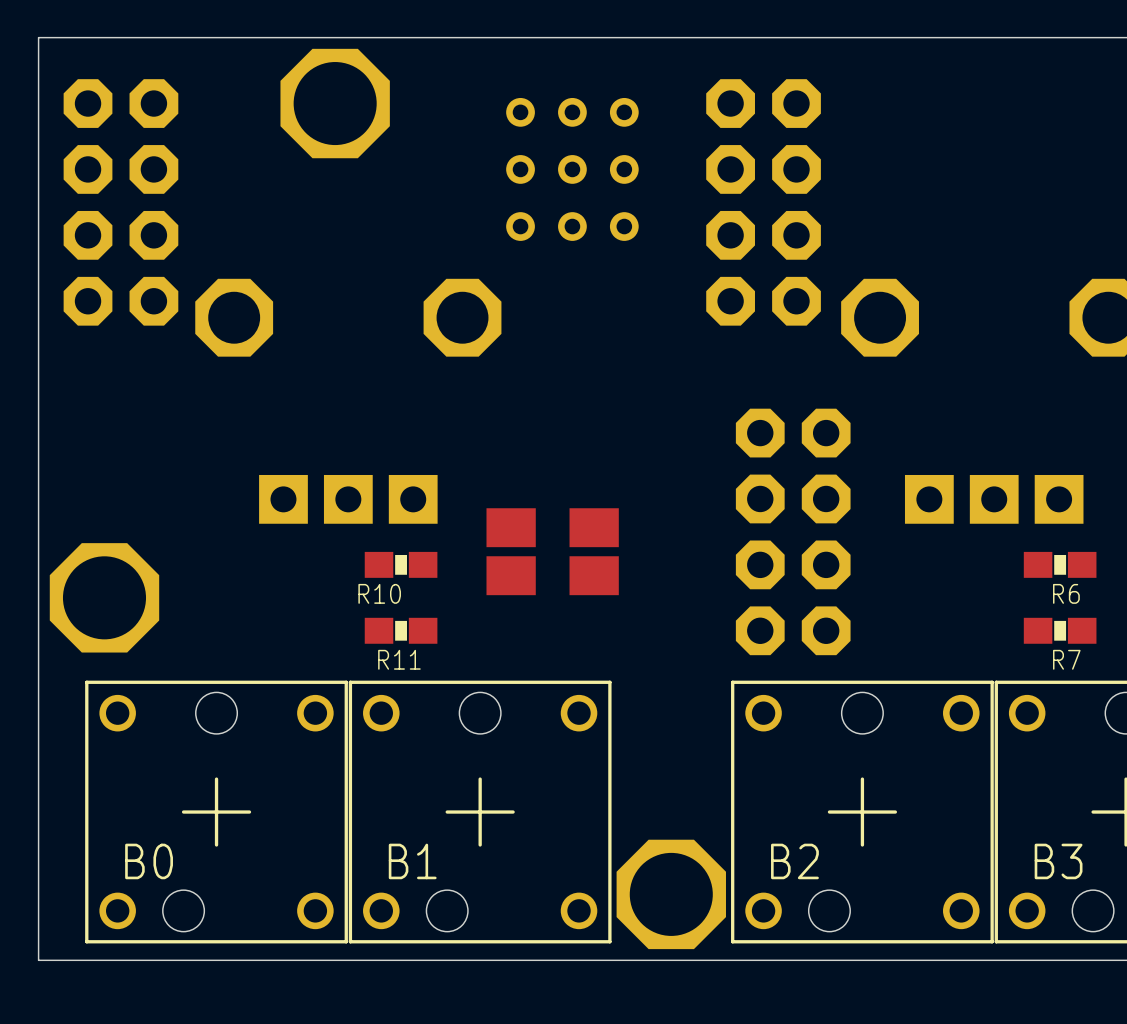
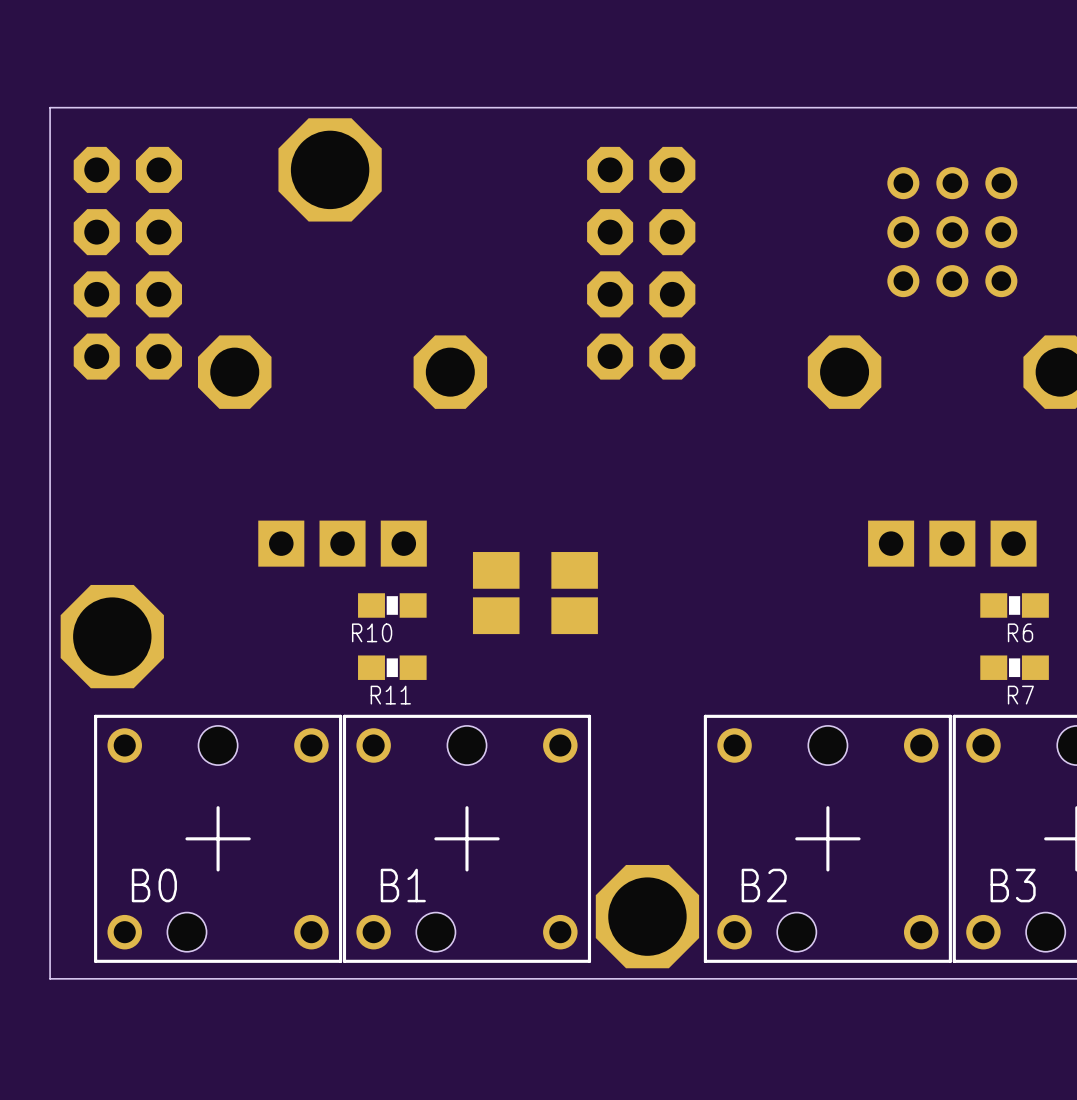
part: (572, 169) -> none
part: none -> (952, 232)
part position: (763, 202) -> (641, 263)
part: (793, 531) -> none

